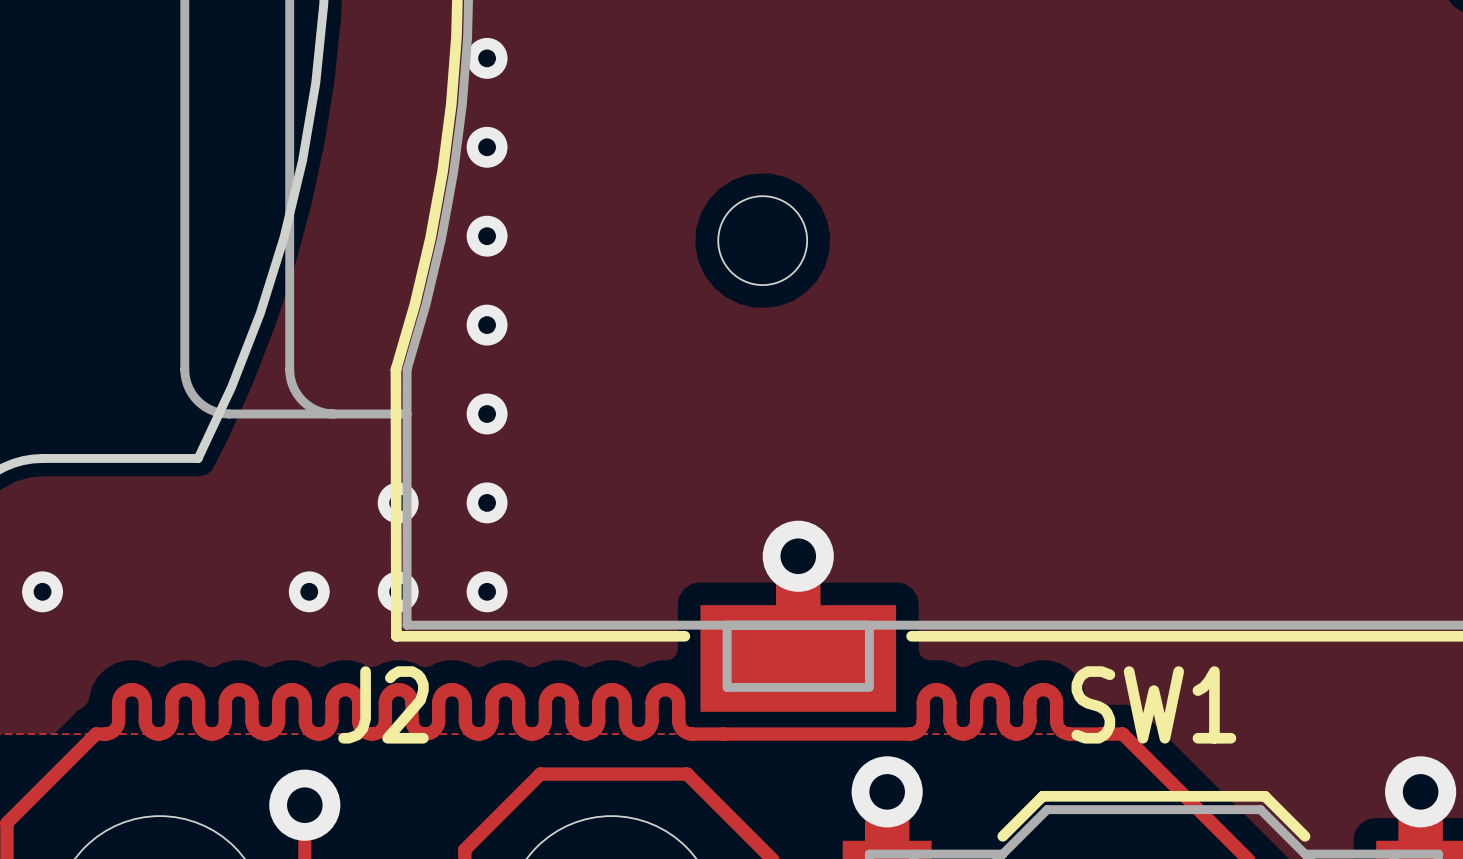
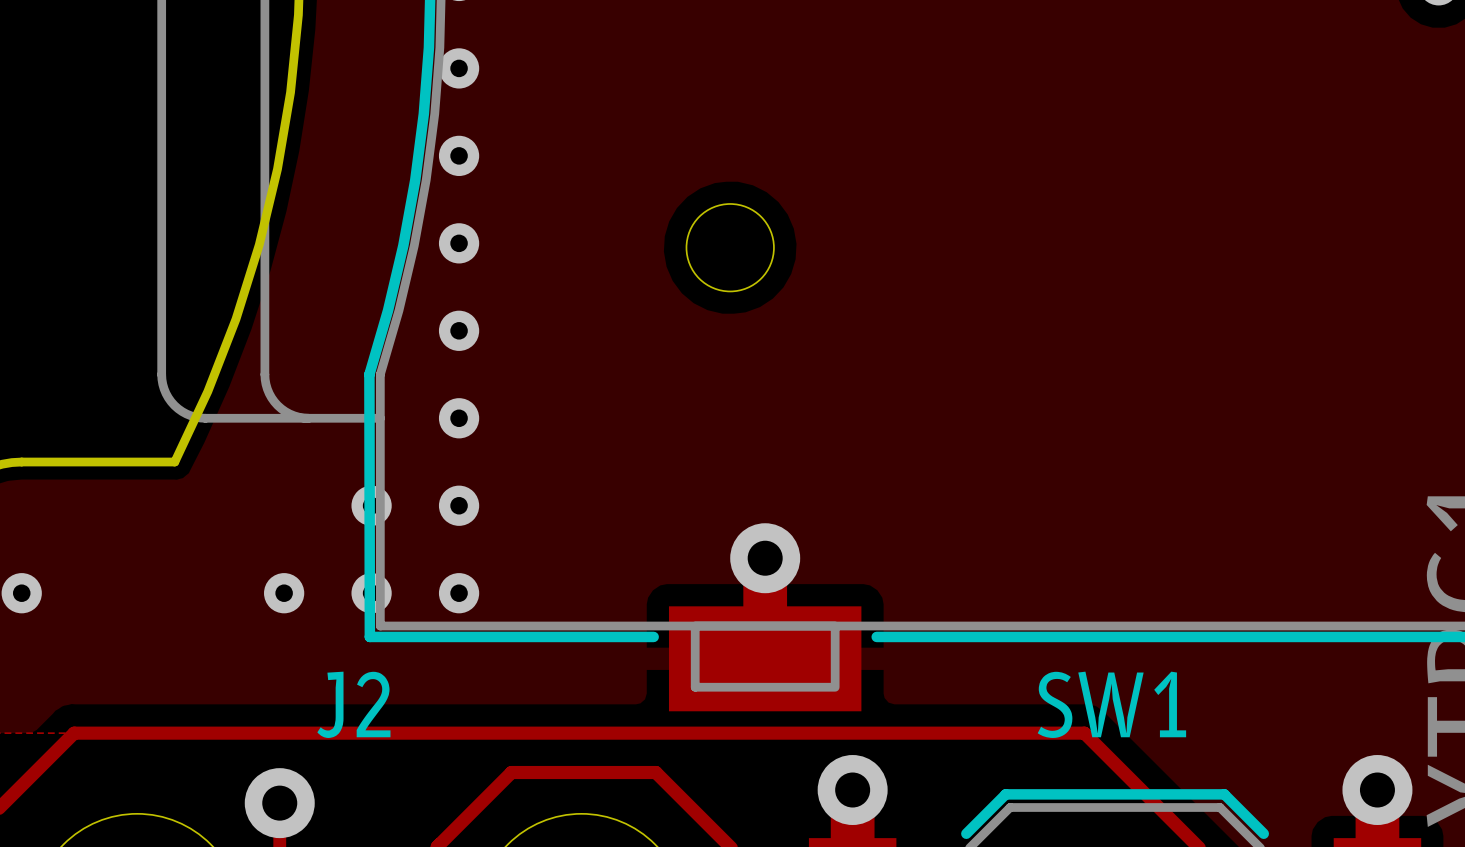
track: (105, 734) (113, 731) (117, 725) (120, 696) (125, 691) (131, 689) (138, 691) (143, 696) (146, 725) (150, 731) (158, 734) (165, 732) (170, 727) (172, 697) (177, 692) (183, 689) (190, 690) (196, 696) (199, 725) (203, 731) (211, 734) (218, 732) (223, 727) (225, 699) (229, 693) (235, 690) (242, 690) (249, 694) (251, 701) (252, 725) (258, 732) (265, 734) (271, 732) (277, 725) (279, 699) (285, 691) (293, 689) (302, 694) (305, 701) (306, 725) (310, 731) (318, 734) (326, 731) (330, 725) (332, 701) (334, 694) (341, 690) (348, 690) (354, 693) (358, 699) (360, 727) (365, 732) (372, 734) (380, 731) (384, 725) (387, 696) (393, 690) (400, 689) (406, 692) (410, 697) (413, 727) (418, 732) (425, 734) (433, 731) (437, 725) (440, 696) (446, 690) (453, 689) (460, 692) (464, 697) (467, 727) (472, 732) (478, 734) (486, 731) (491, 725) (493, 696) (500, 690) (507, 689) (513, 692) (517, 697) (520, 727) (525, 732) (532, 734) (540, 731) (544, 725) (547, 696) (553, 690) (560, 689) (566, 692) (571, 697) (573, 727) (578, 732) (585, 734) (593, 731) (597, 725) (600, 696) (606, 690) (613, 689) (620, 692) (624, 697) (627, 727) (632, 732) (638, 734) (646, 731) (651, 725) (653, 696) (660, 690) (667, 689) (673, 692) (677, 697) (680, 727) (685, 732) (692, 734) -> (83, 733) (660, 733)
track: (909, 734) (916, 732) (921, 727) (924, 697) (929, 691) (936, 689) (943, 691) (948, 696) (950, 725) (955, 731) (963, 734) (971, 731) (975, 725) (977, 699) (983, 691) (991, 689) (1000, 694) (1003, 701) (1004, 725) (1008, 731) (1016, 734) (1024, 731) (1028, 725) (1030, 701) (1032, 694) (1039, 690) (1046, 690) (1052, 693) (1056, 699) (1058, 727) (1063, 732) (1069, 734) -> (875, 733) (1032, 733)

